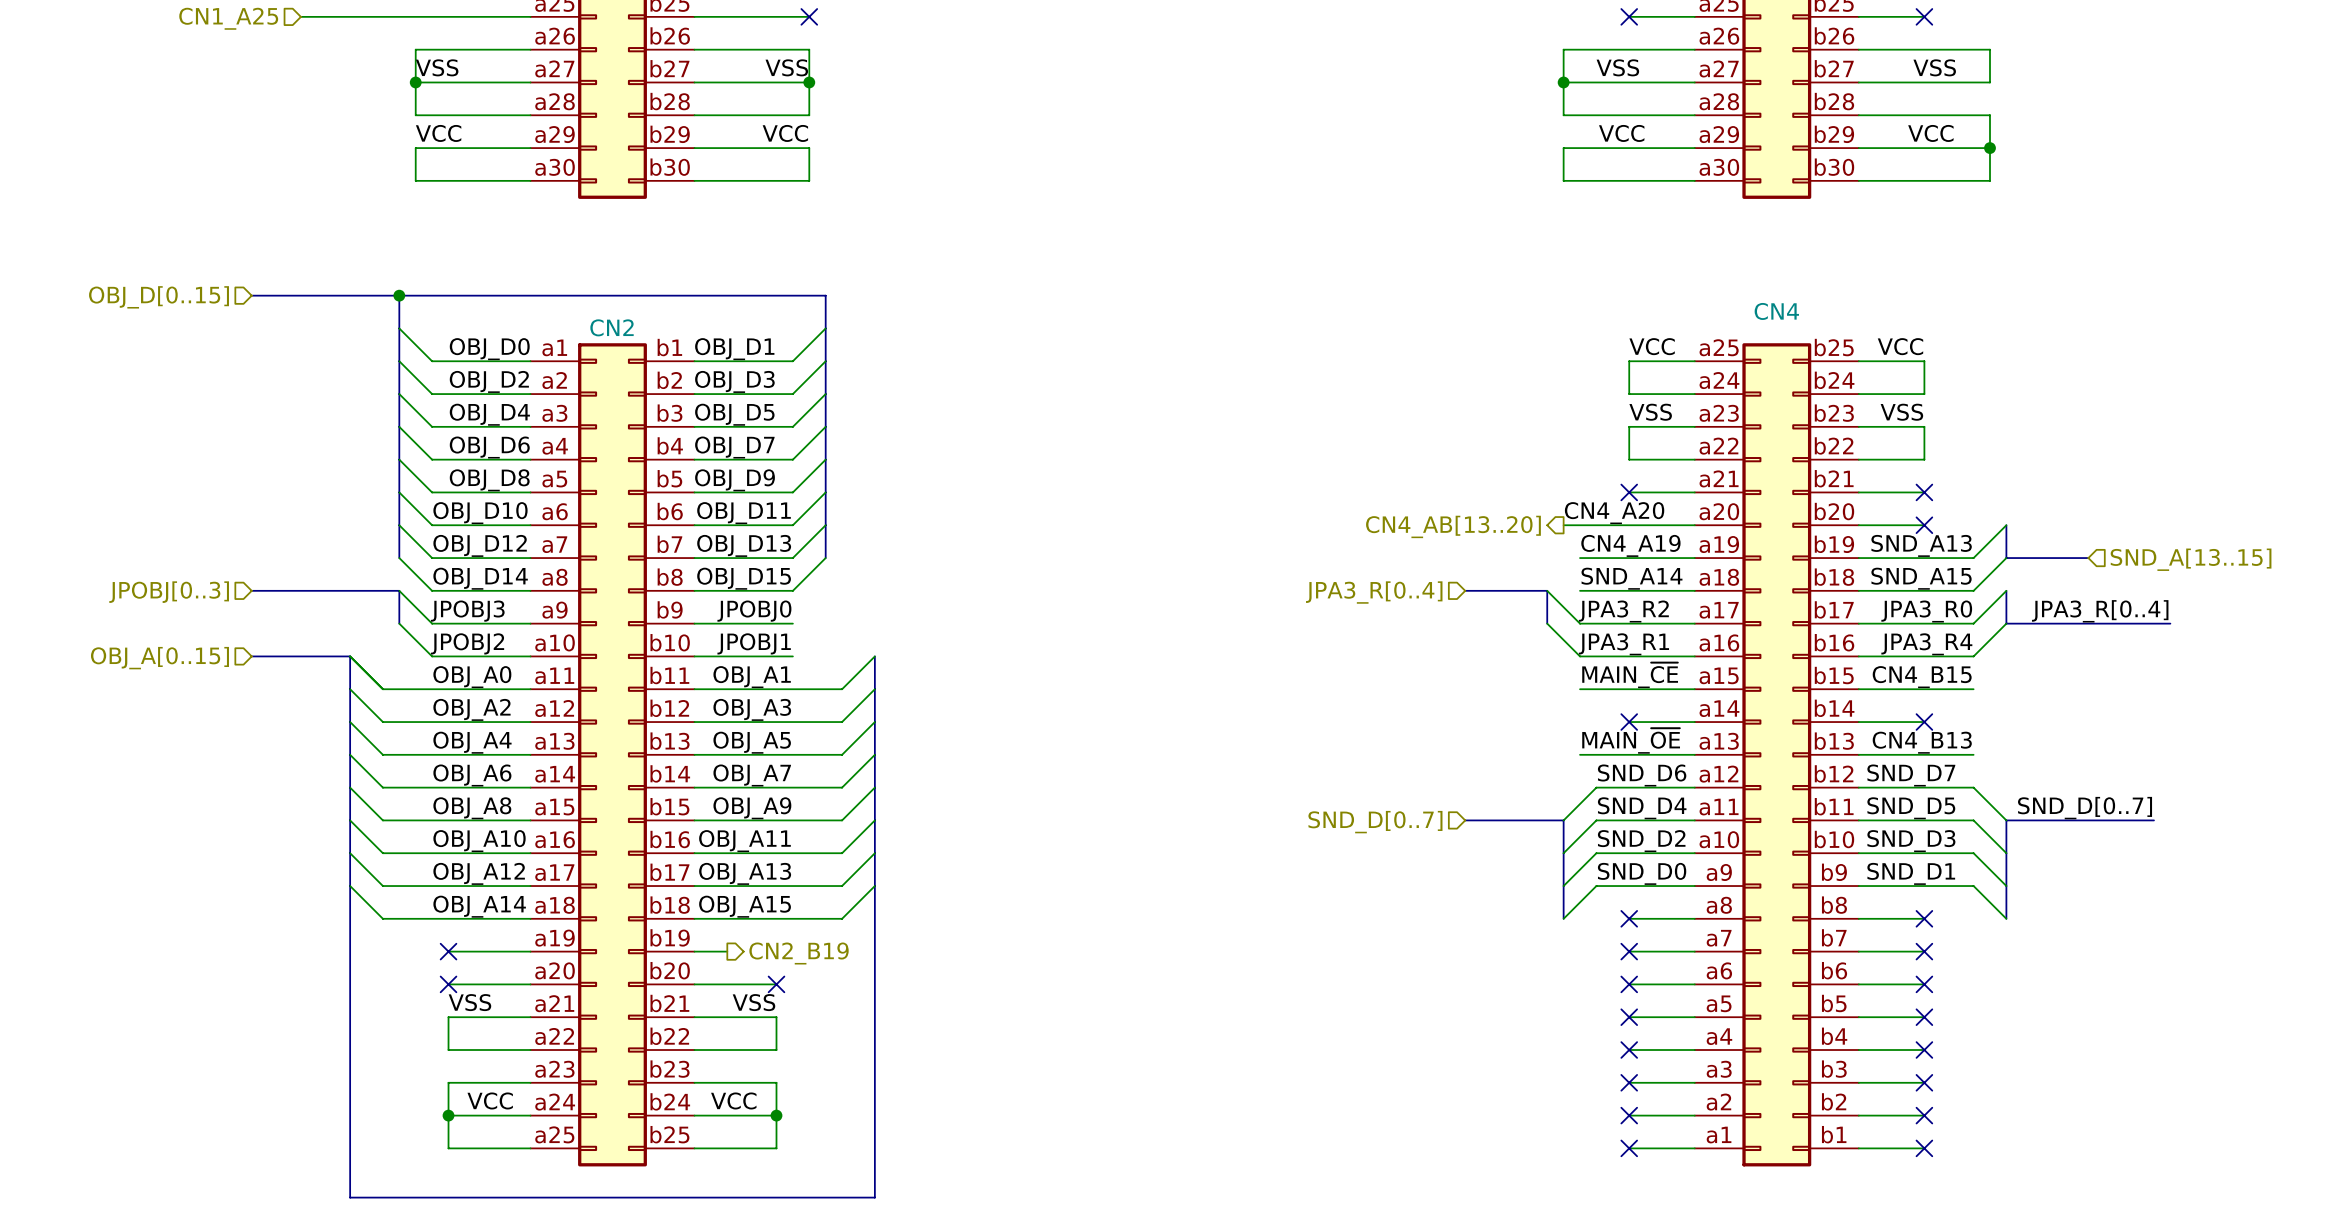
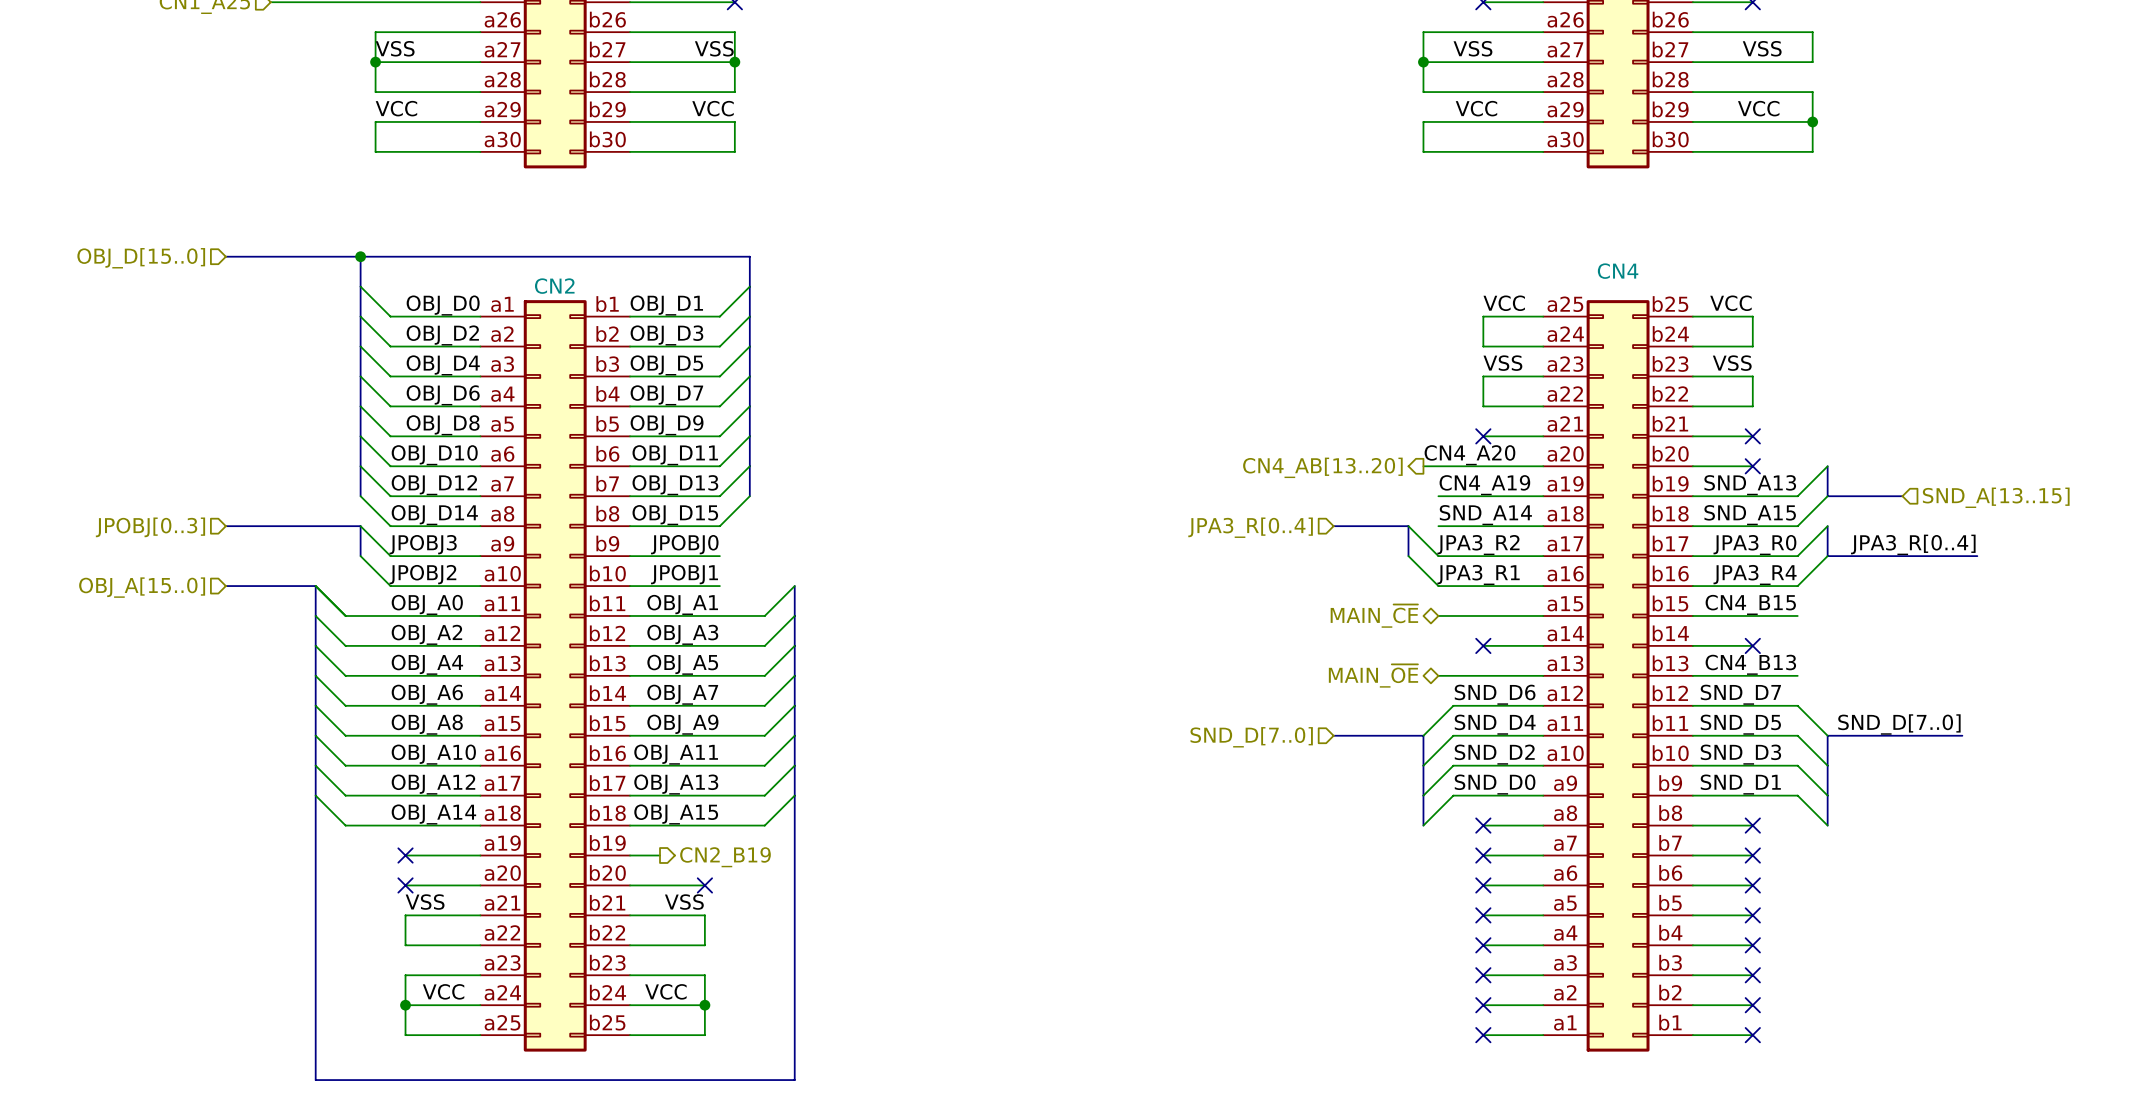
hierarchical label: OBJ_D[0..15] (159, 297) -> OBJ_D[15..0] (141, 258)
hierarchical label: OBJ_A[0..15] (159, 658) -> OBJ_A[15..0] (142, 587)
label: MAIN_~{CE} (1630, 675) -> none
hierarchical label: none -> MAIN_~{CE} (1374, 616)
label: MAIN_~{OE} (1631, 740) -> none
hierarchical label: none -> MAIN_~{OE} (1373, 676)
label: SND_D[0..7] (2085, 808) -> SND_D[7..0] (1899, 724)
hierarchical label: SND_D[0..7] (1375, 822) -> SND_D[7..0] (1251, 737)

